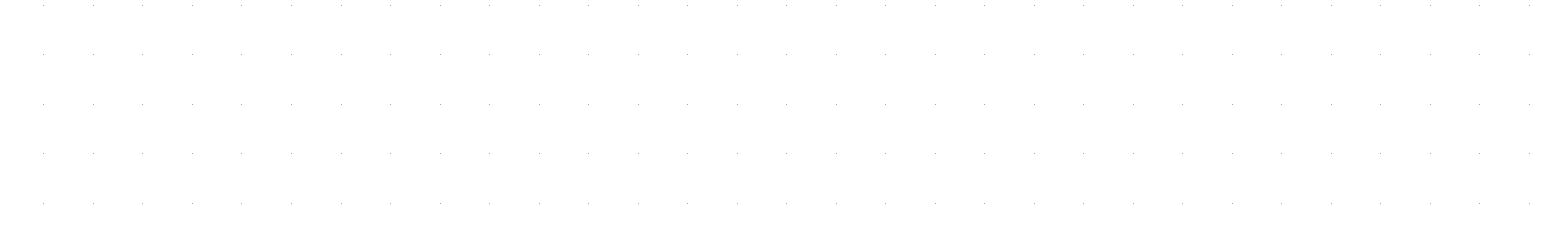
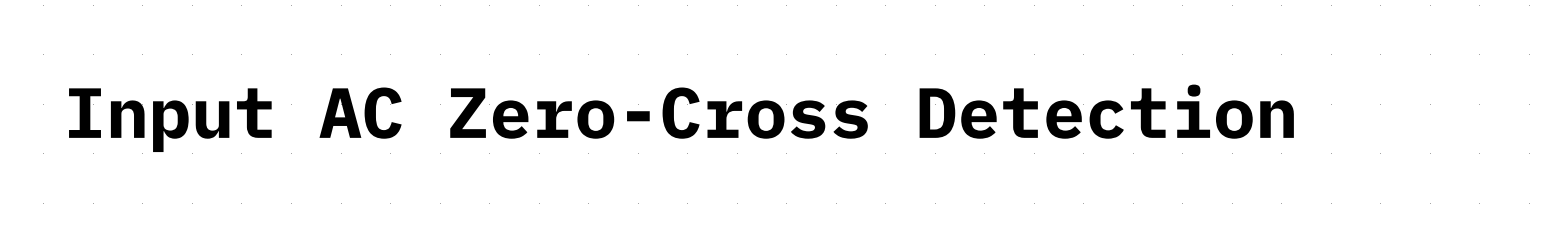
text: none -> Input AC Zero-Cross Detection (681, 118)

